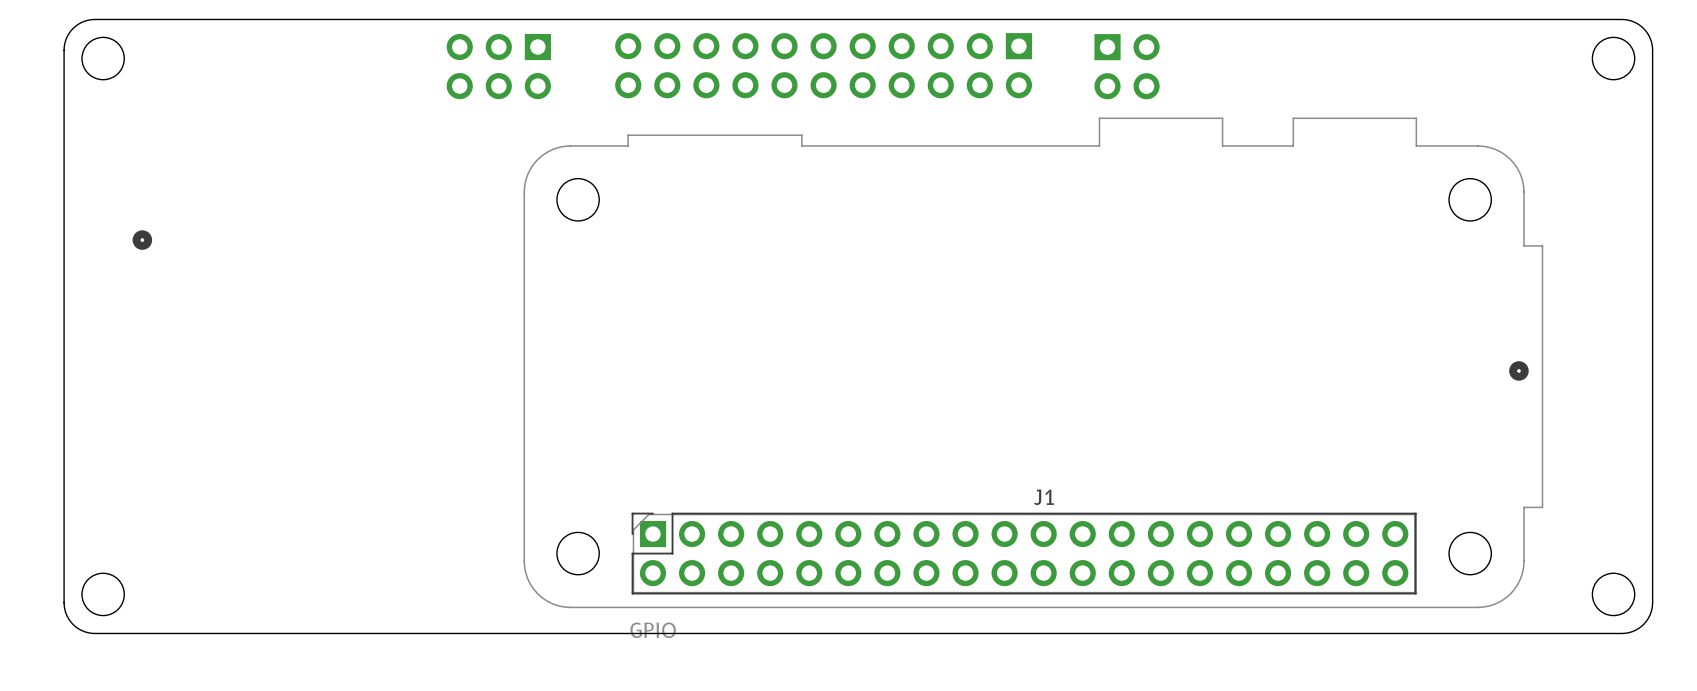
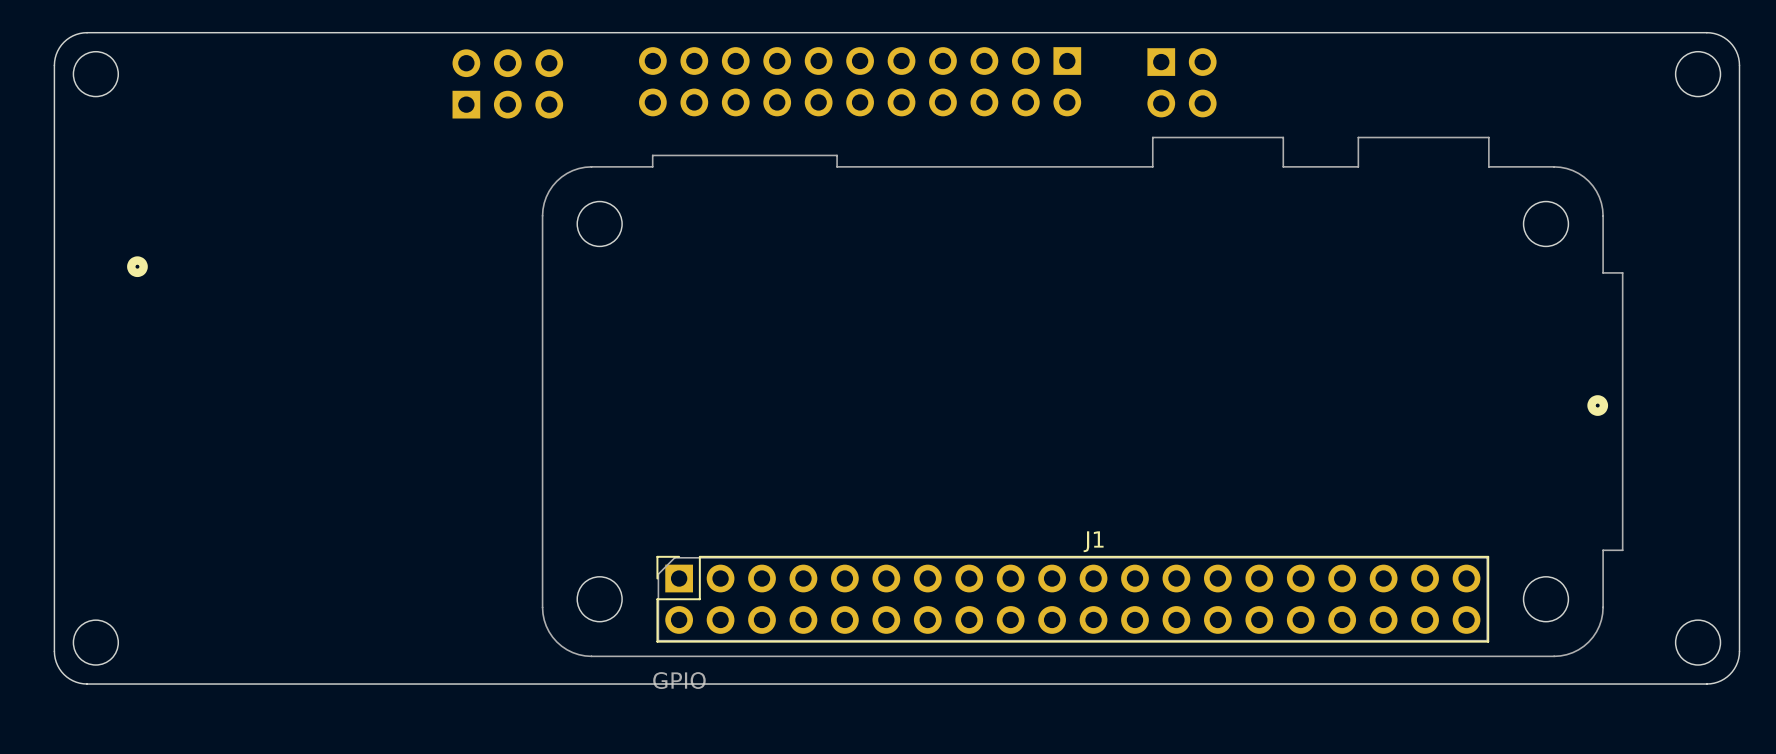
part rotation: 0° (498, 66) -> 180° (507, 83)

